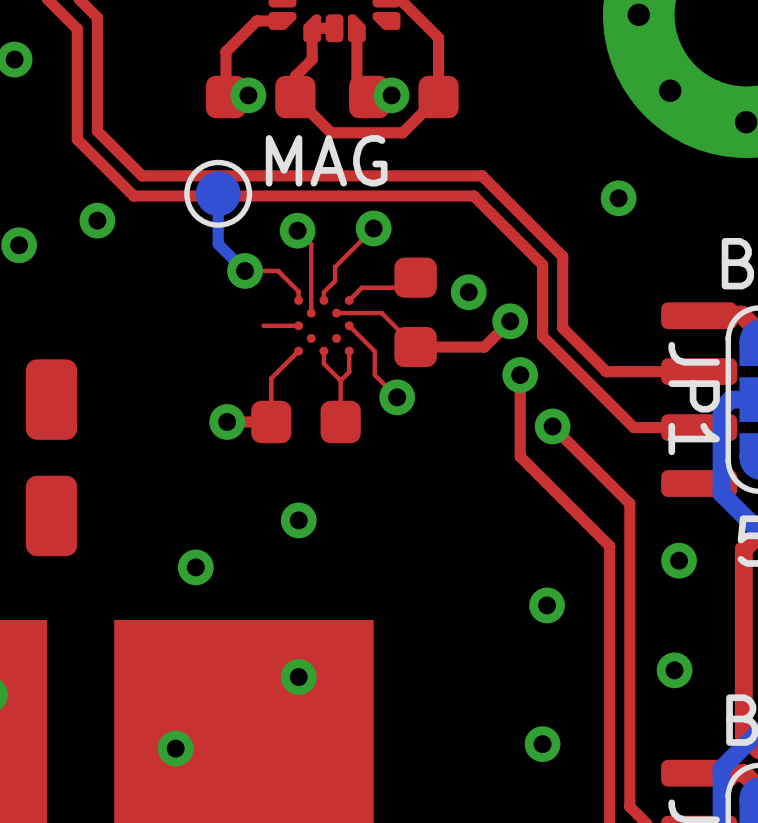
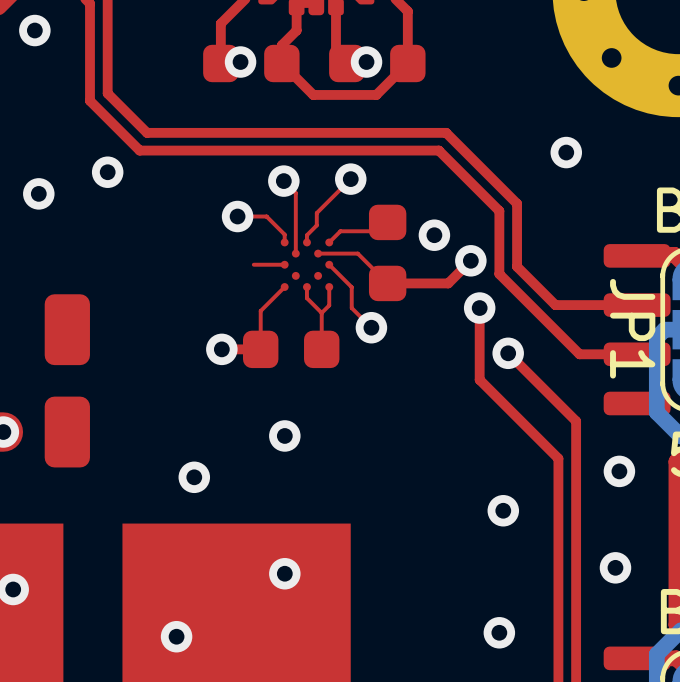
bottom track: (218, 193) (218, 244) (245, 270) -> none
part: (218, 193) -> none

